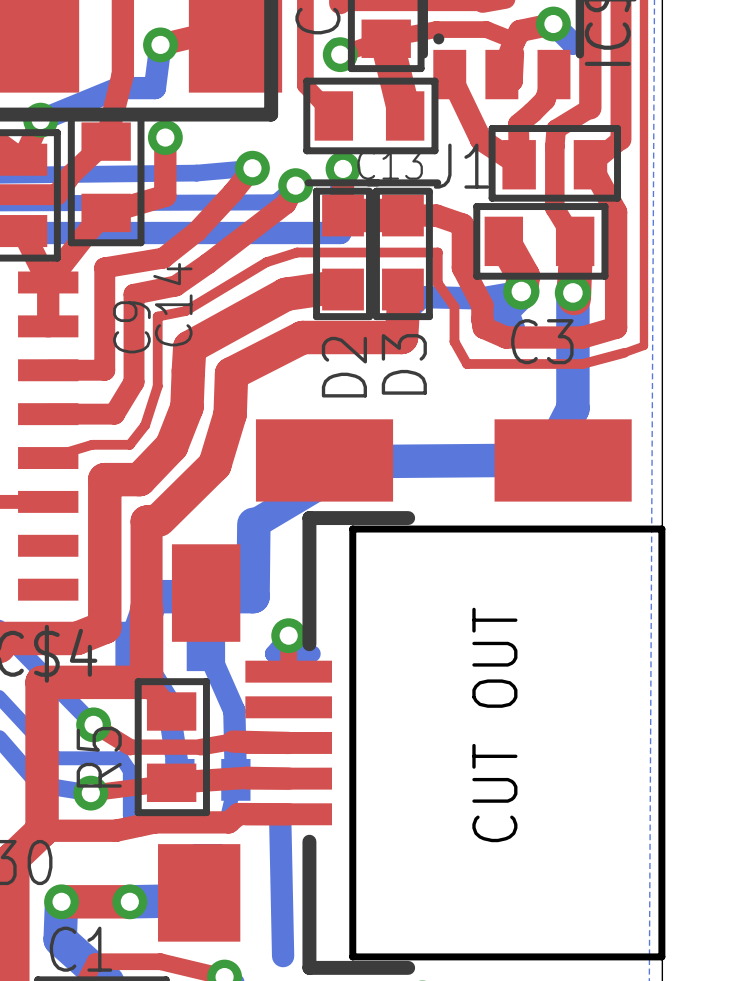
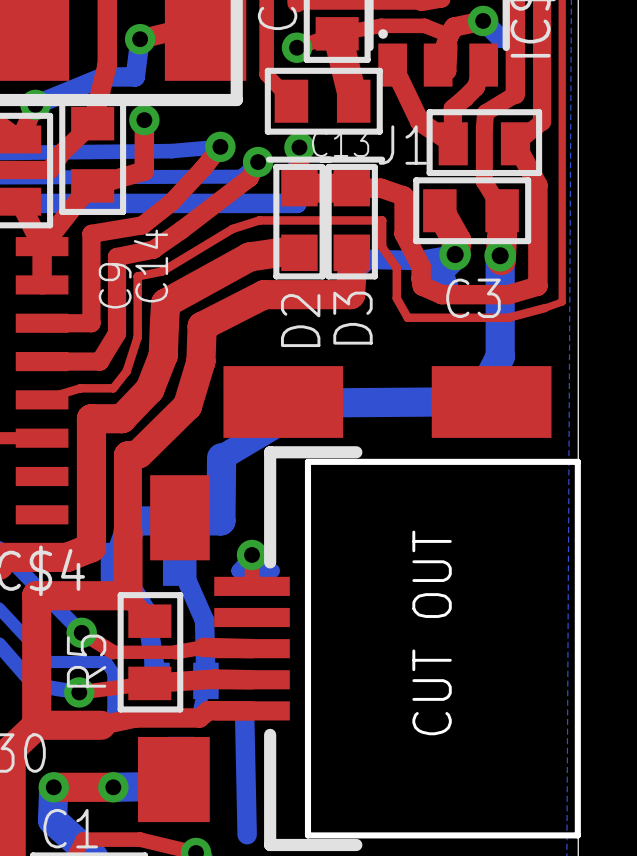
top track width: thin (42, 830) (115, 830) -> thick (36, 725) (101, 725)

